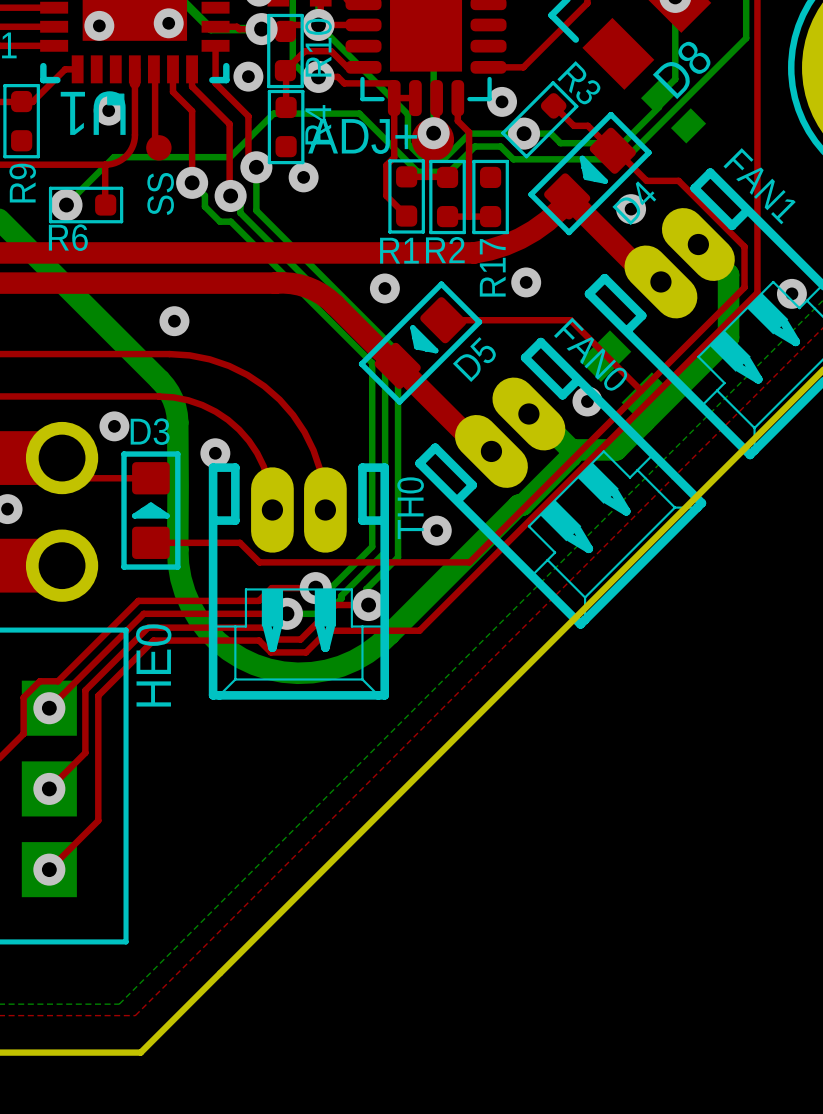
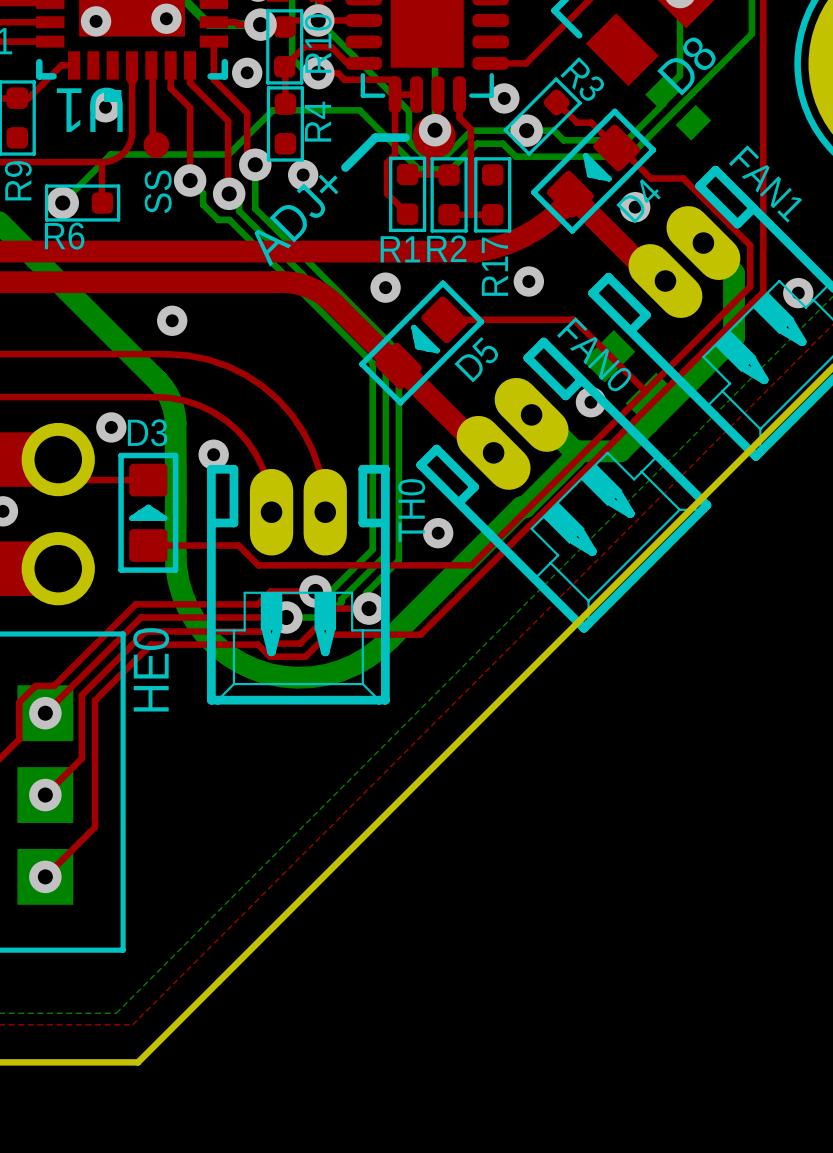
ADJ+ name rotation: 0° (362, 136) -> 45° counterclockwise (296, 220)
line: none -> (405, 137) (375, 137) (345, 167)

